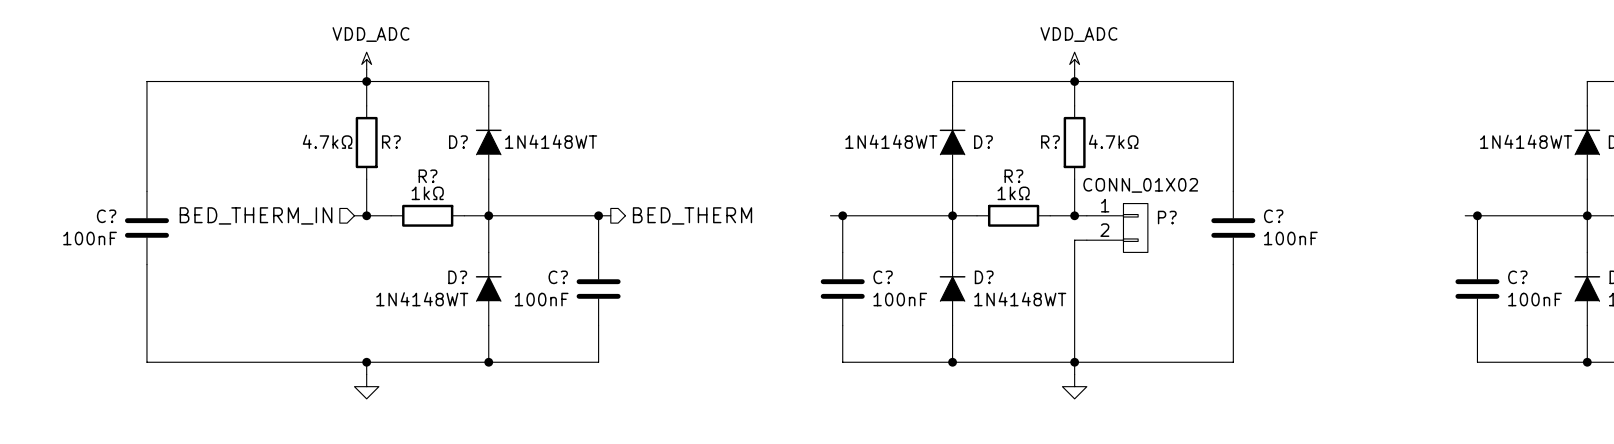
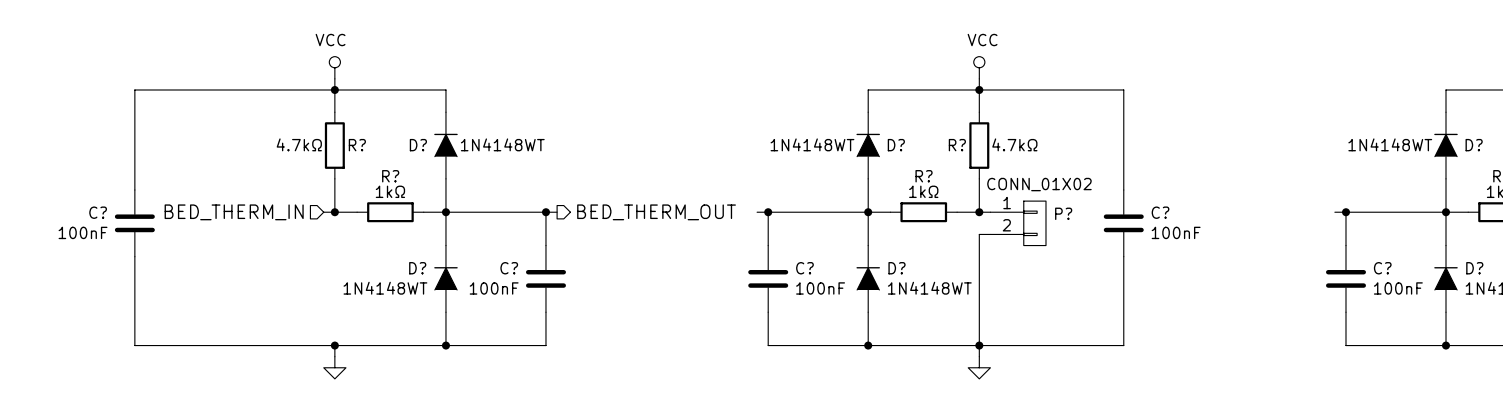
power symbol: VDD_ADC (366, 60) -> VCC (334, 67)
power symbol: VDD_ADC (1074, 60) -> VCC (979, 67)
hierarchical label: BED_THERM (692, 215) -> BED_THERM_OUT (656, 212)

